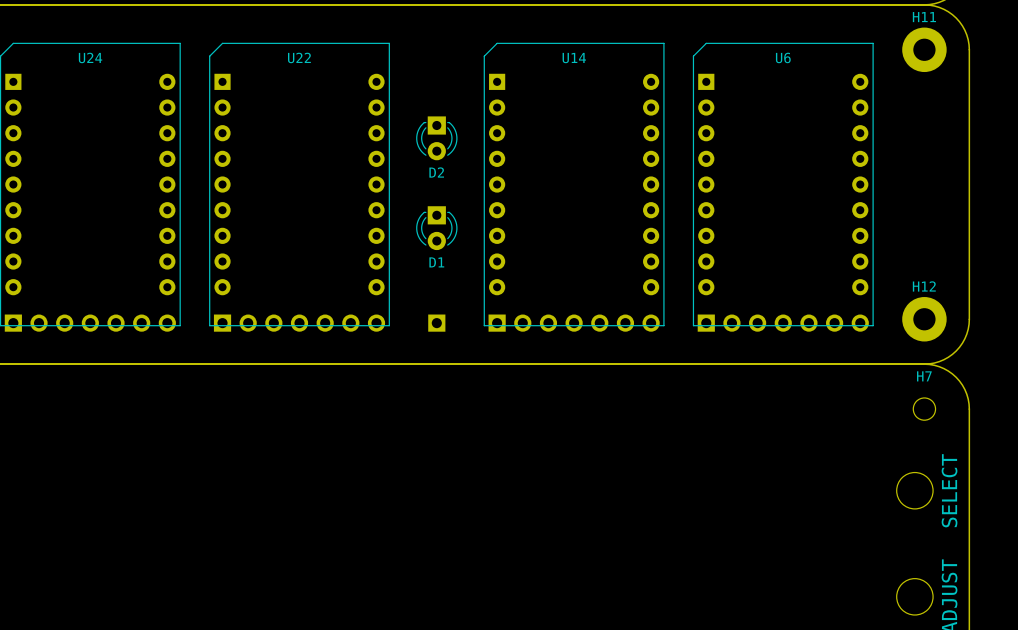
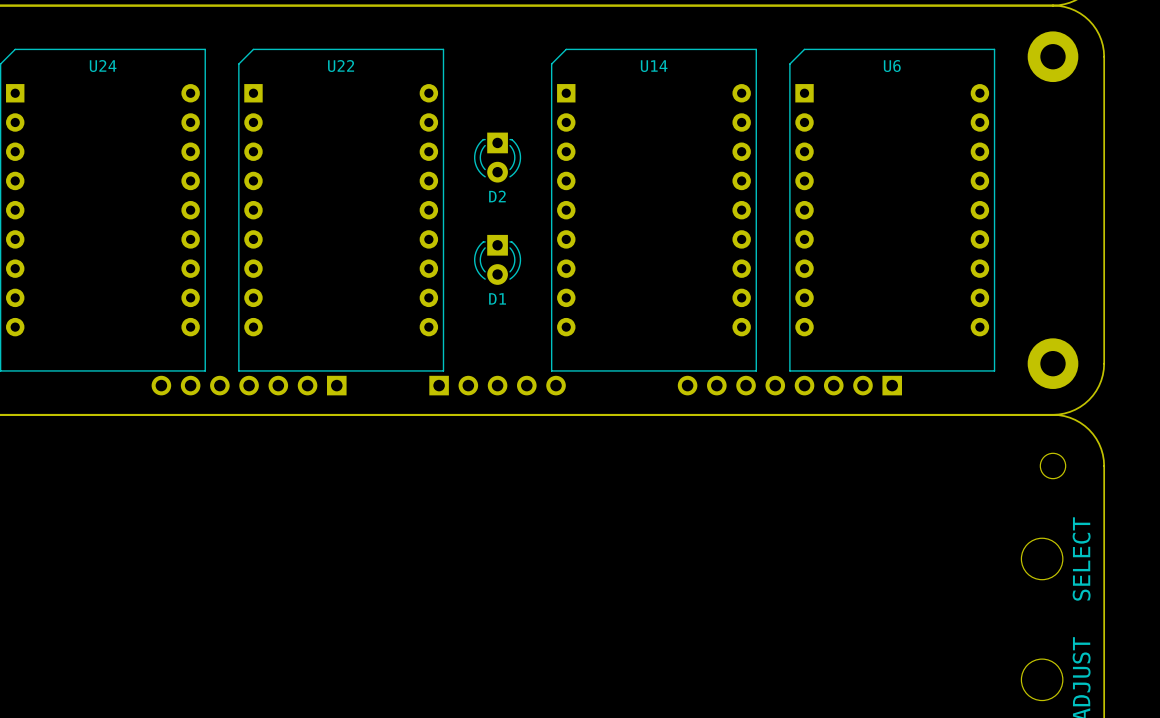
H11 name: H11 (924, 17) -> none
H12 name: H12 (924, 286) -> none
part: (90, 323) -> none
part: (299, 323) -> none
part: (436, 323) -> none
part: (574, 323) -> none
part: (783, 323) -> none
part: none -> (249, 385)
part: none -> (497, 385)
part: none -> (789, 385)
H7 name: H7 (924, 376) -> none

